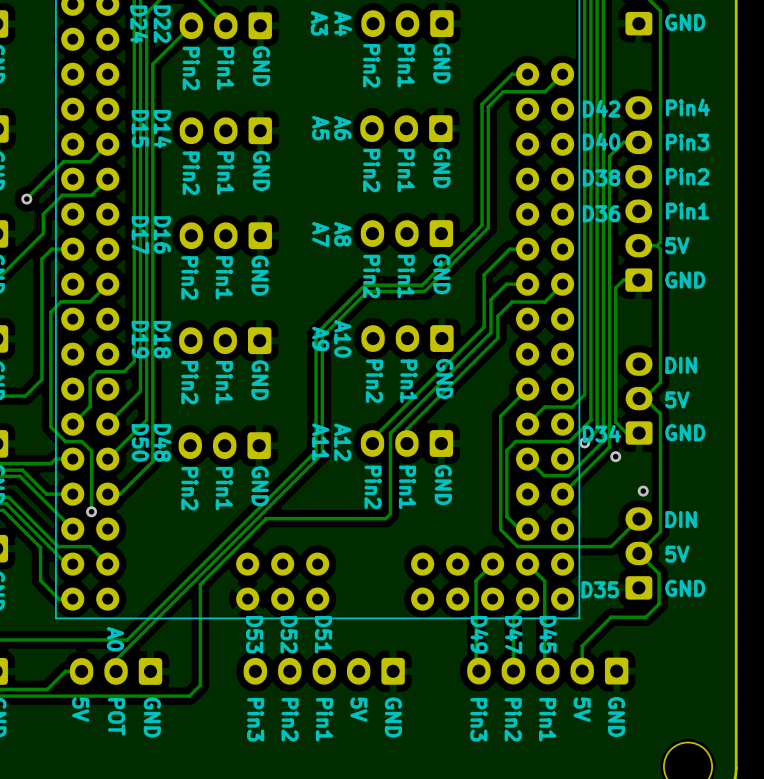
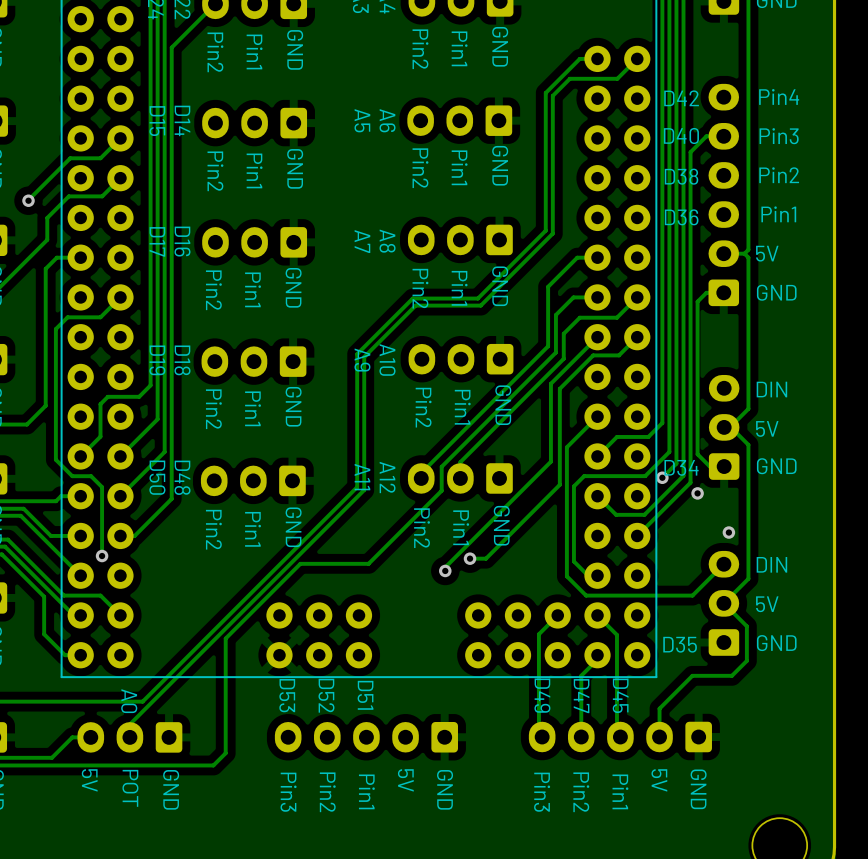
track: none -> (597, 337) (550, 383) (550, 461) (445, 567) (445, 570)
track: none -> (637, 337) (619, 355) (593, 355) (559, 388) (559, 484) (485, 558) (470, 558)
track: (390, 454) (390, 513) (385, 518) (326, 518) -> (441, 490) (368, 563)
via: none -> (470, 558)
via: none -> (445, 570)

